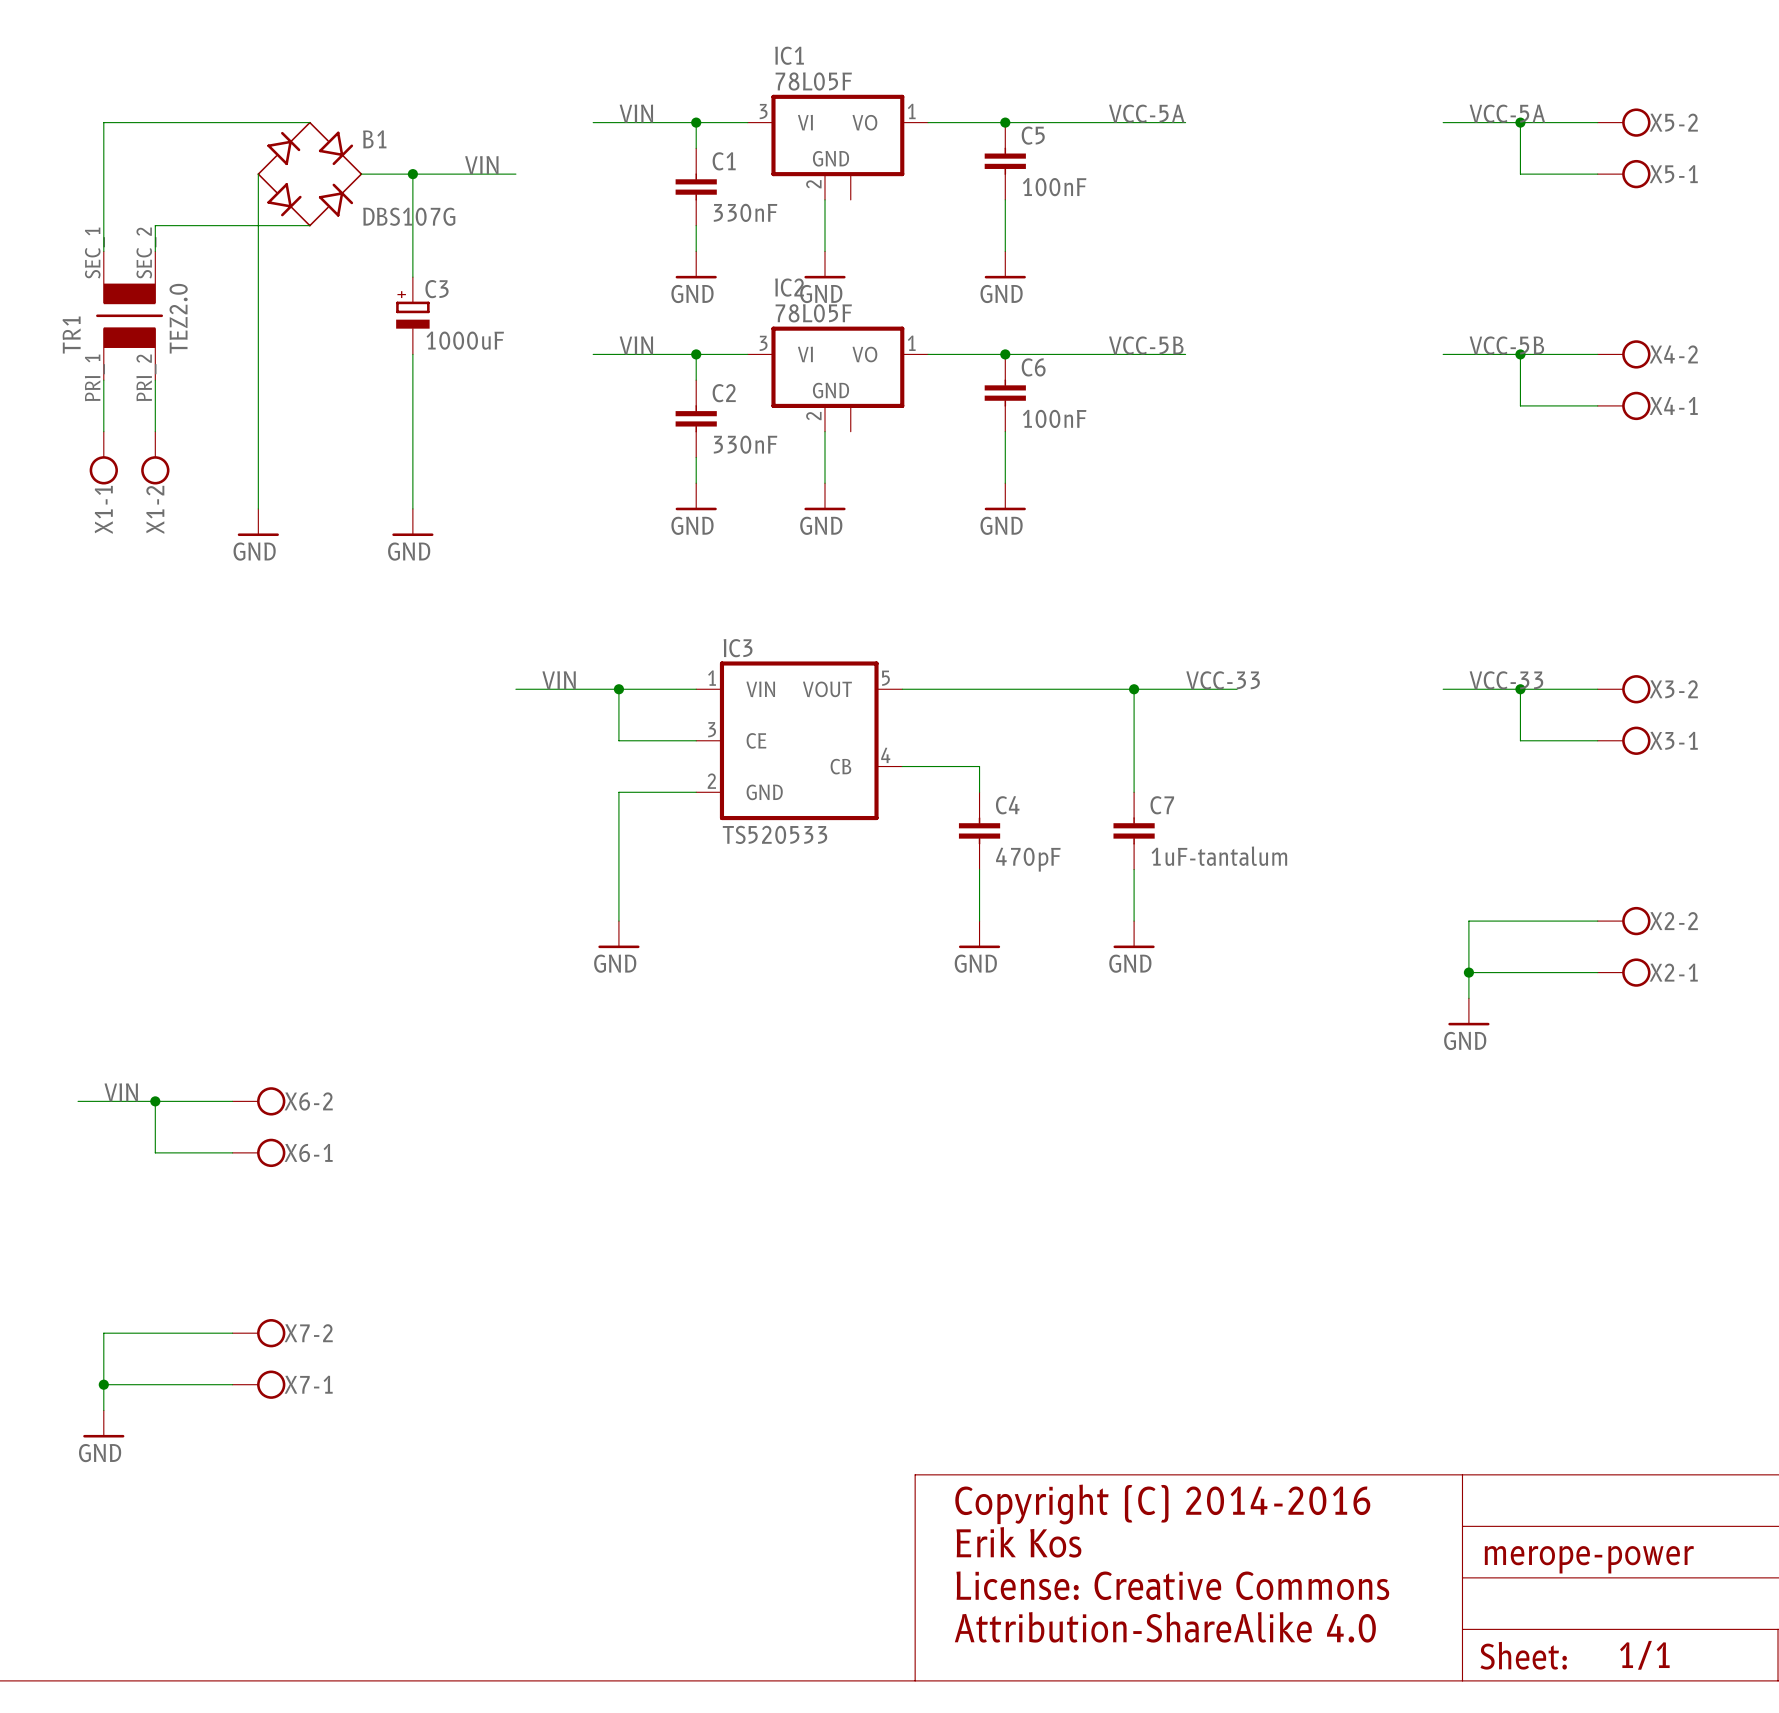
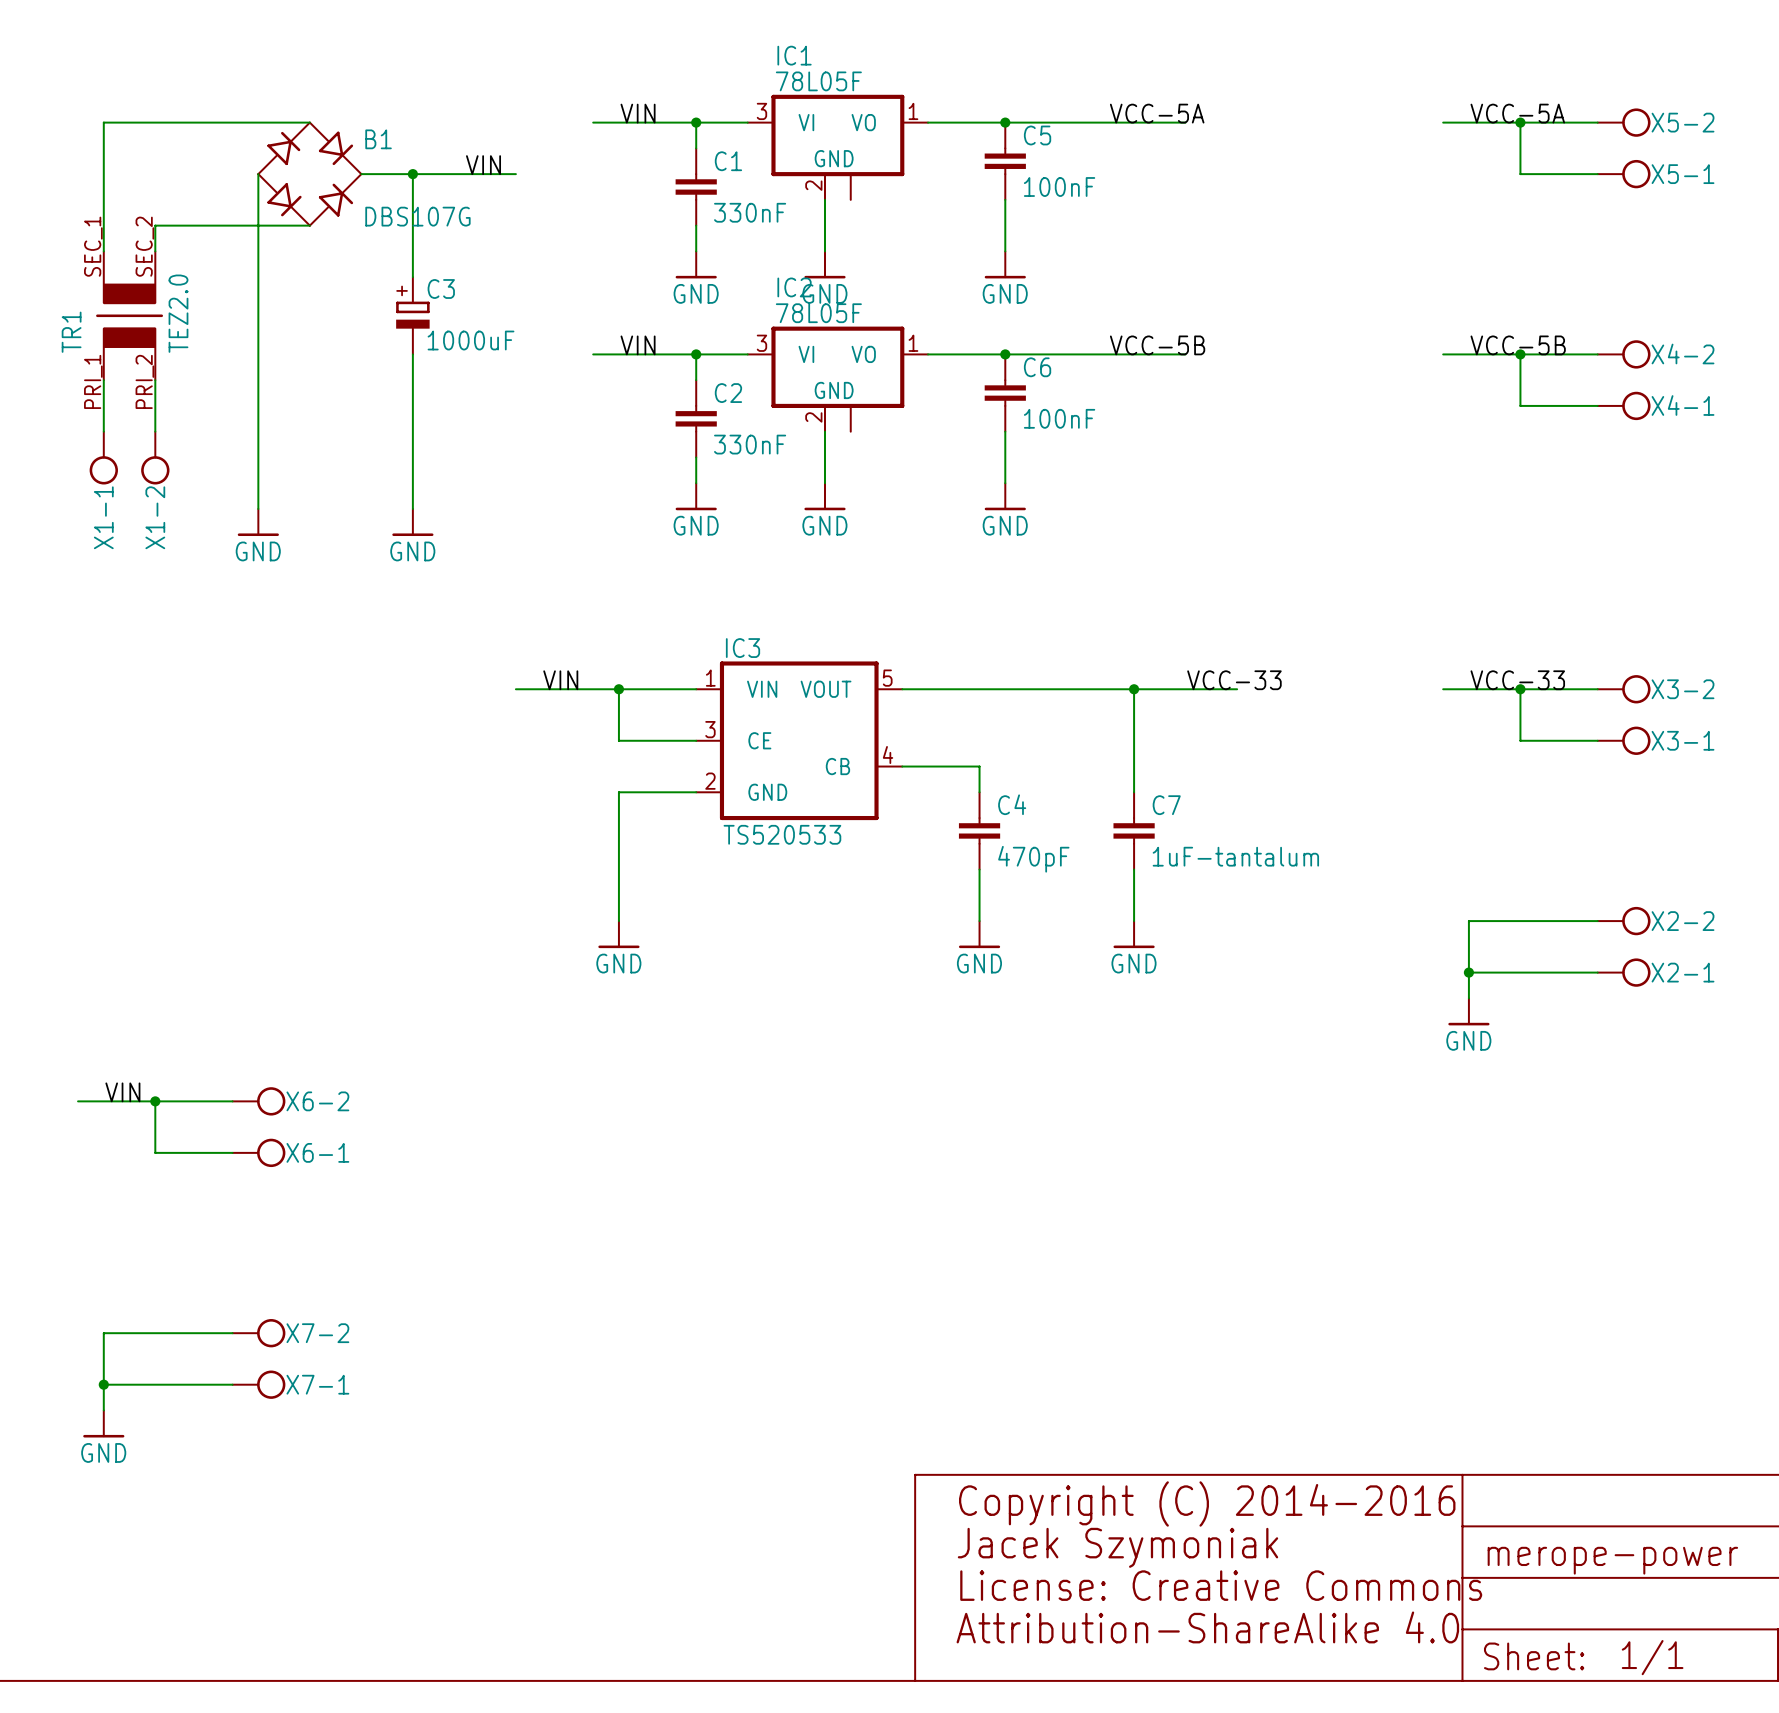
text: Erik Kos (1018, 1542) -> Jacek Szymoniak (1117, 1547)

